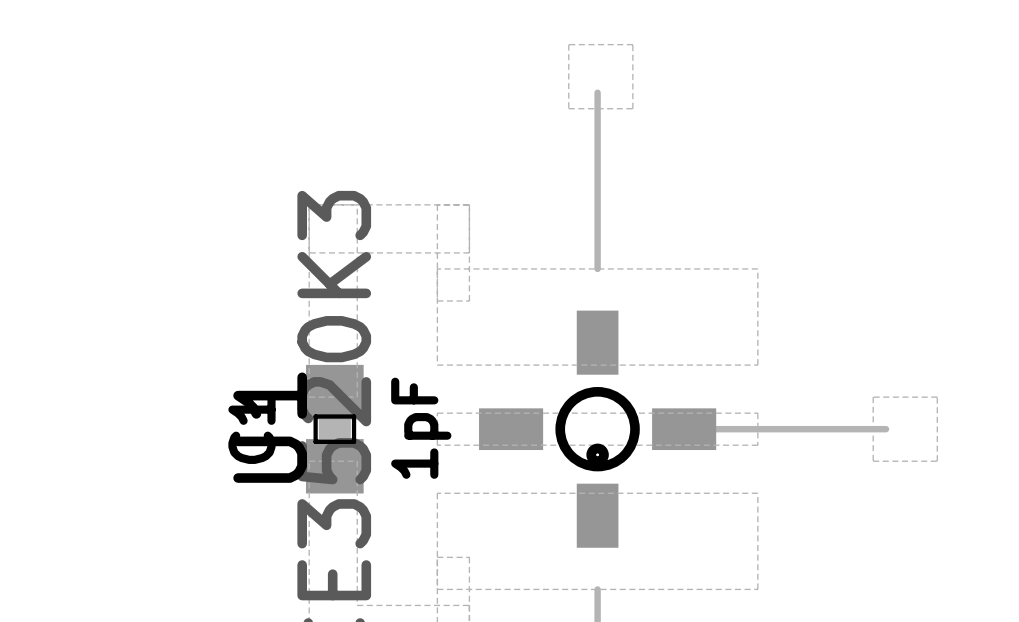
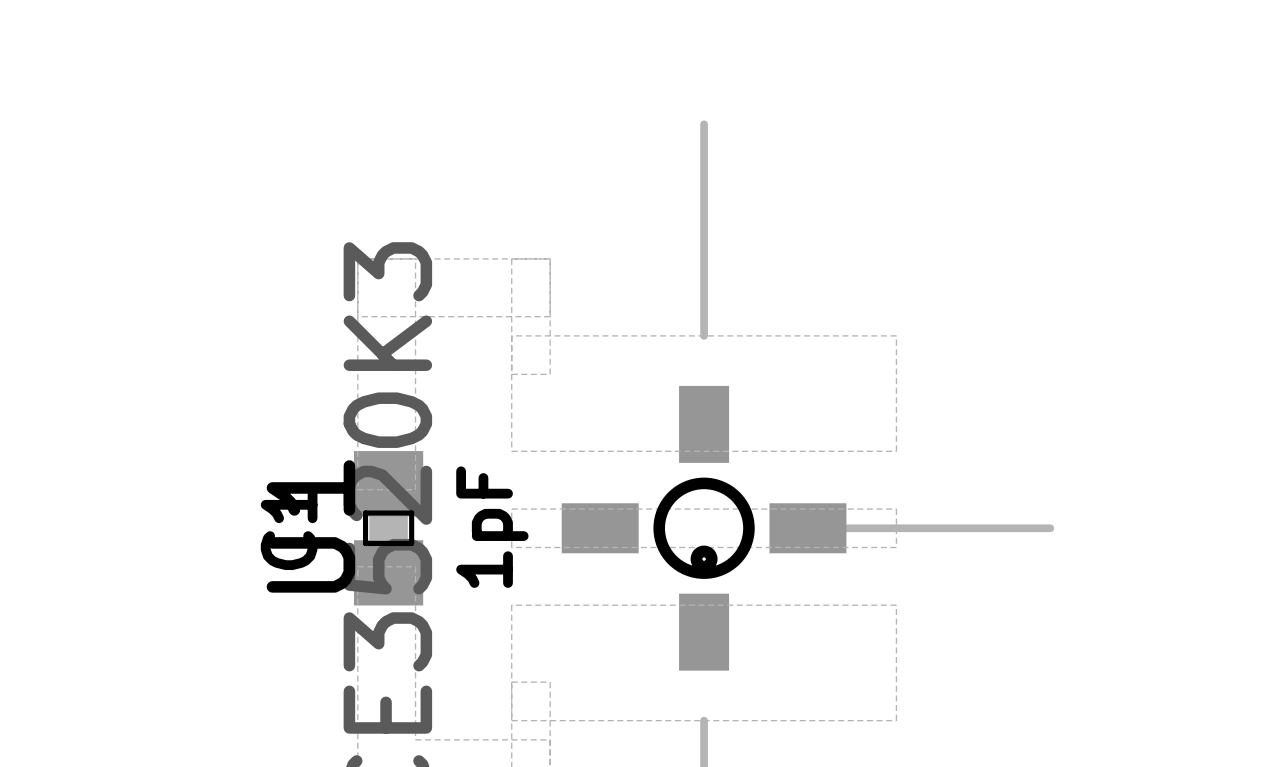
zone outline: (568, 44) (632, 44) (632, 108) (568, 108) (568, 44) -> none
zone outline: (873, 397) (873, 461) (937, 461) (937, 397) (873, 397) -> none

